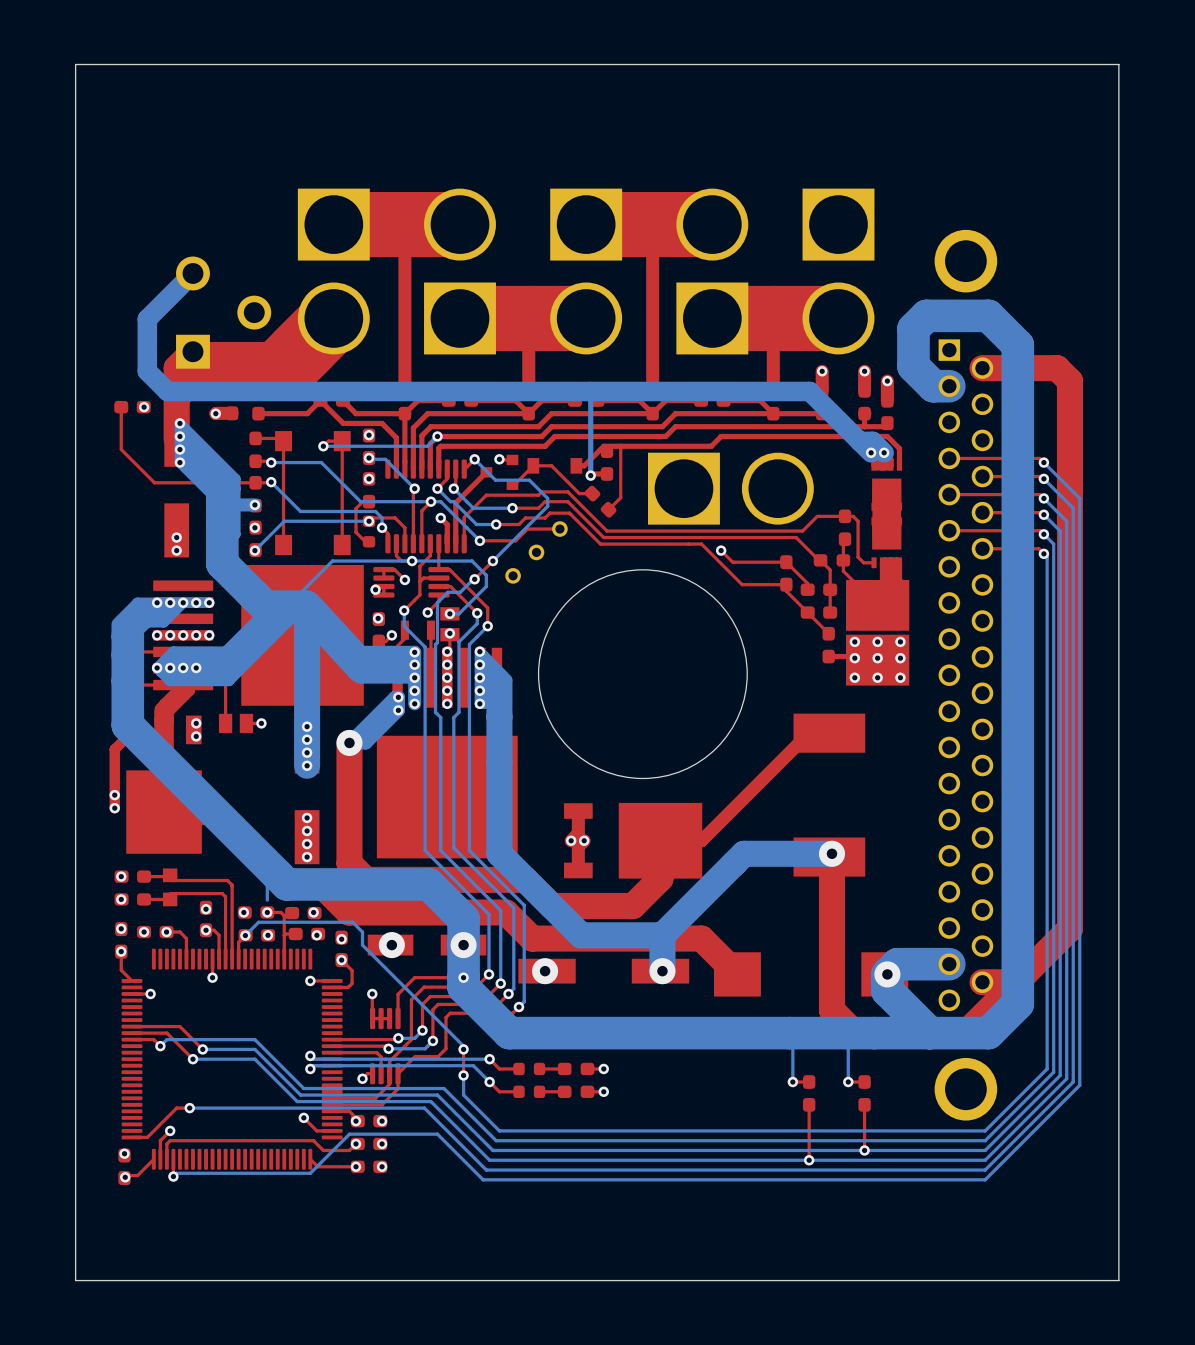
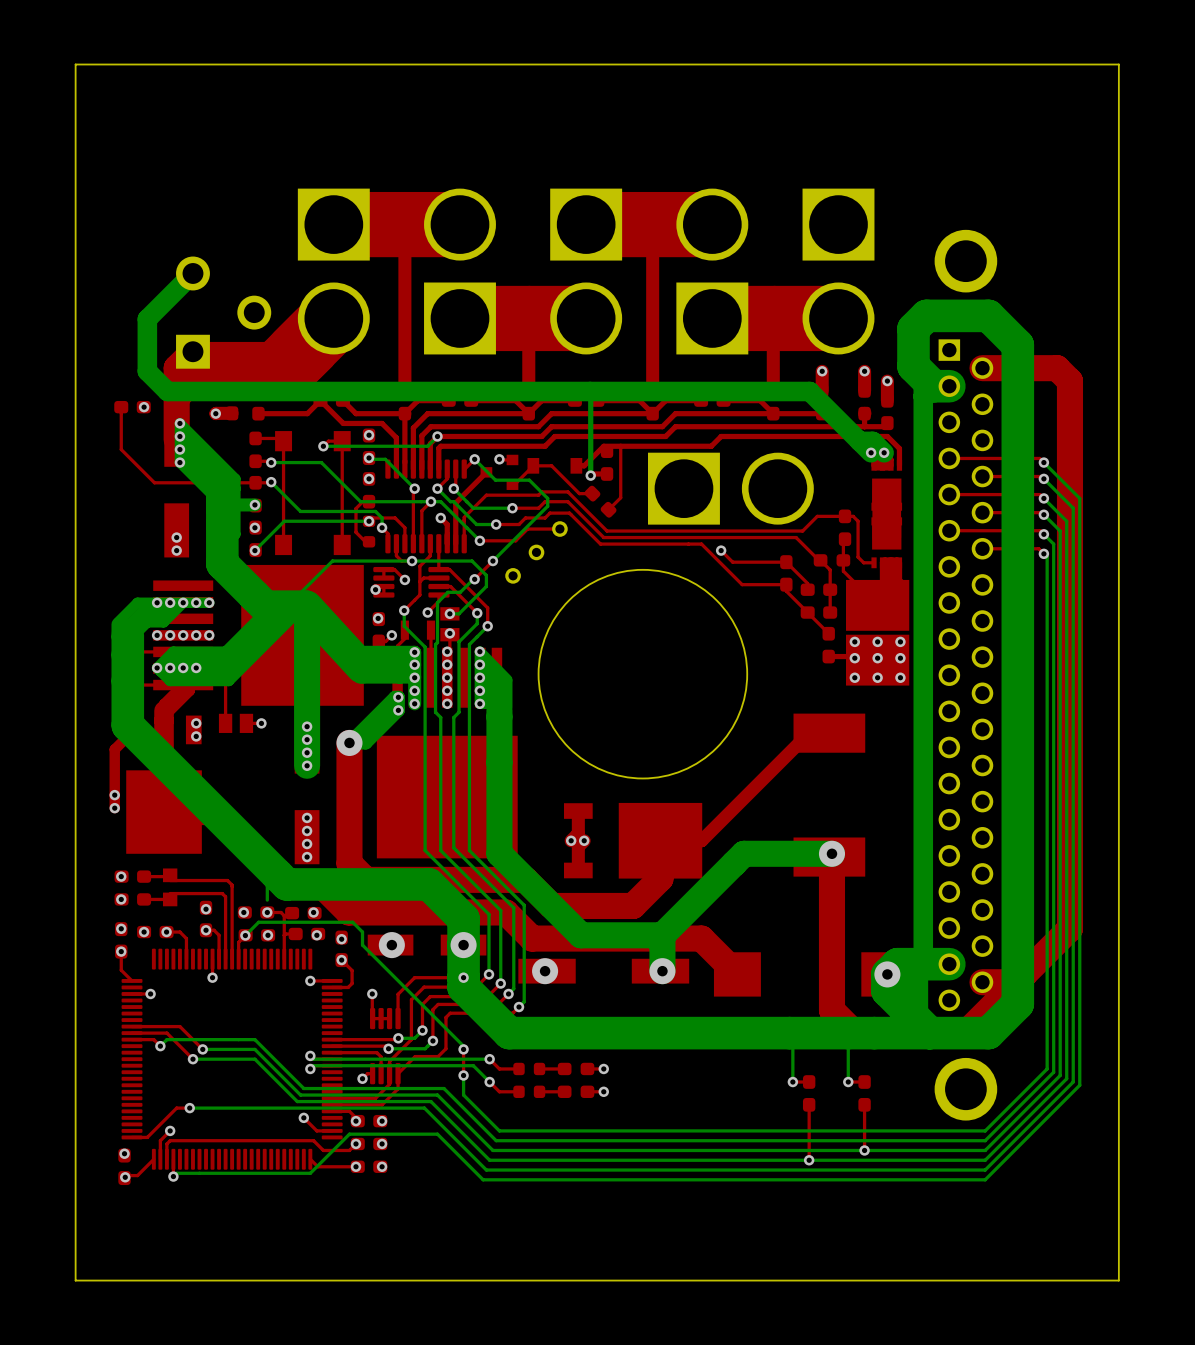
bottom track: none -> (913, 366) (923, 376) (923, 964) (915, 972) (915, 1018)

